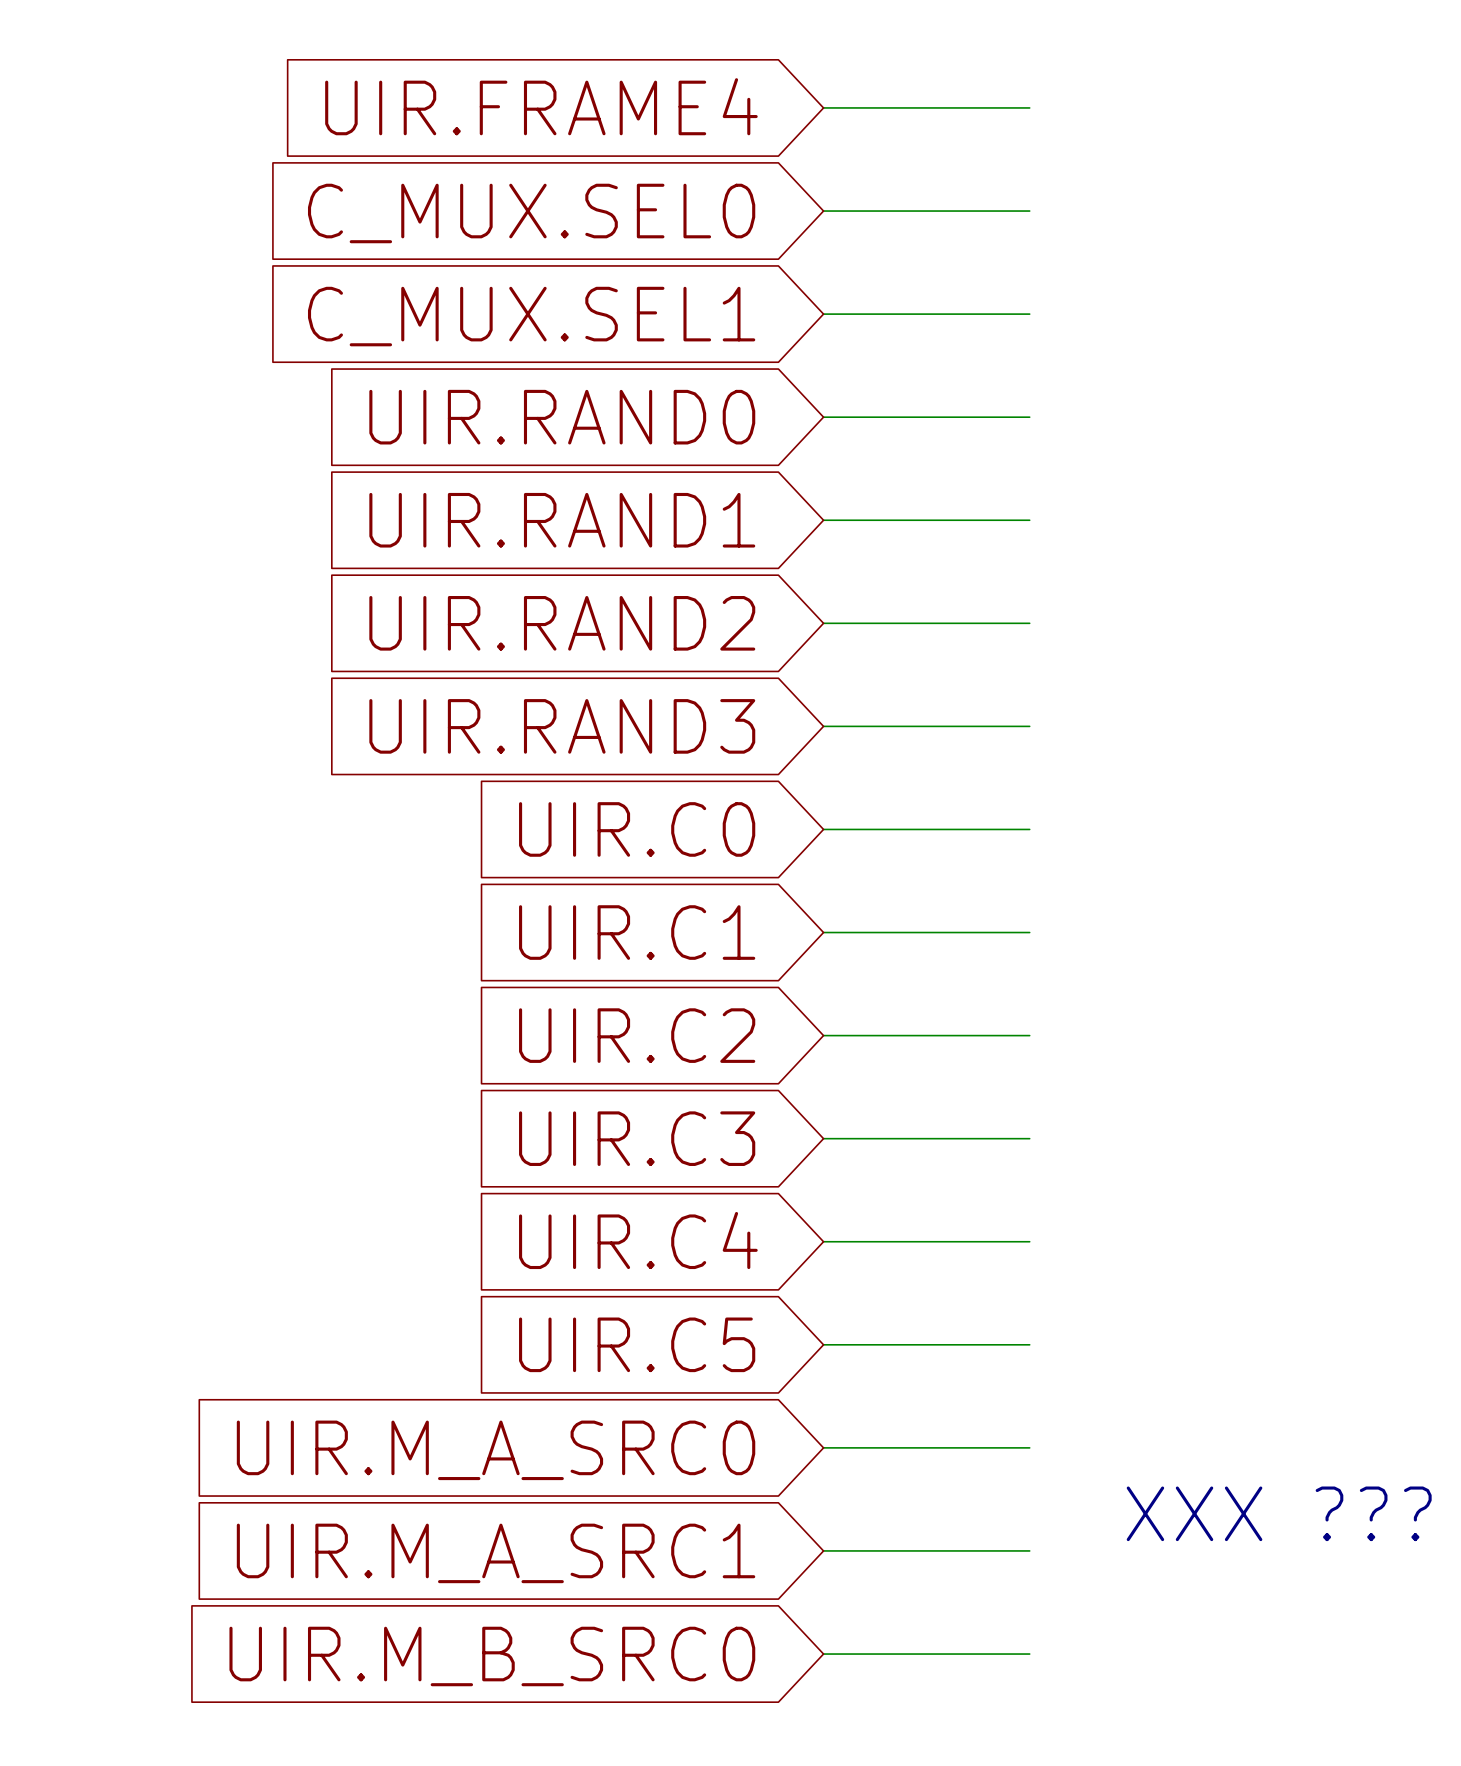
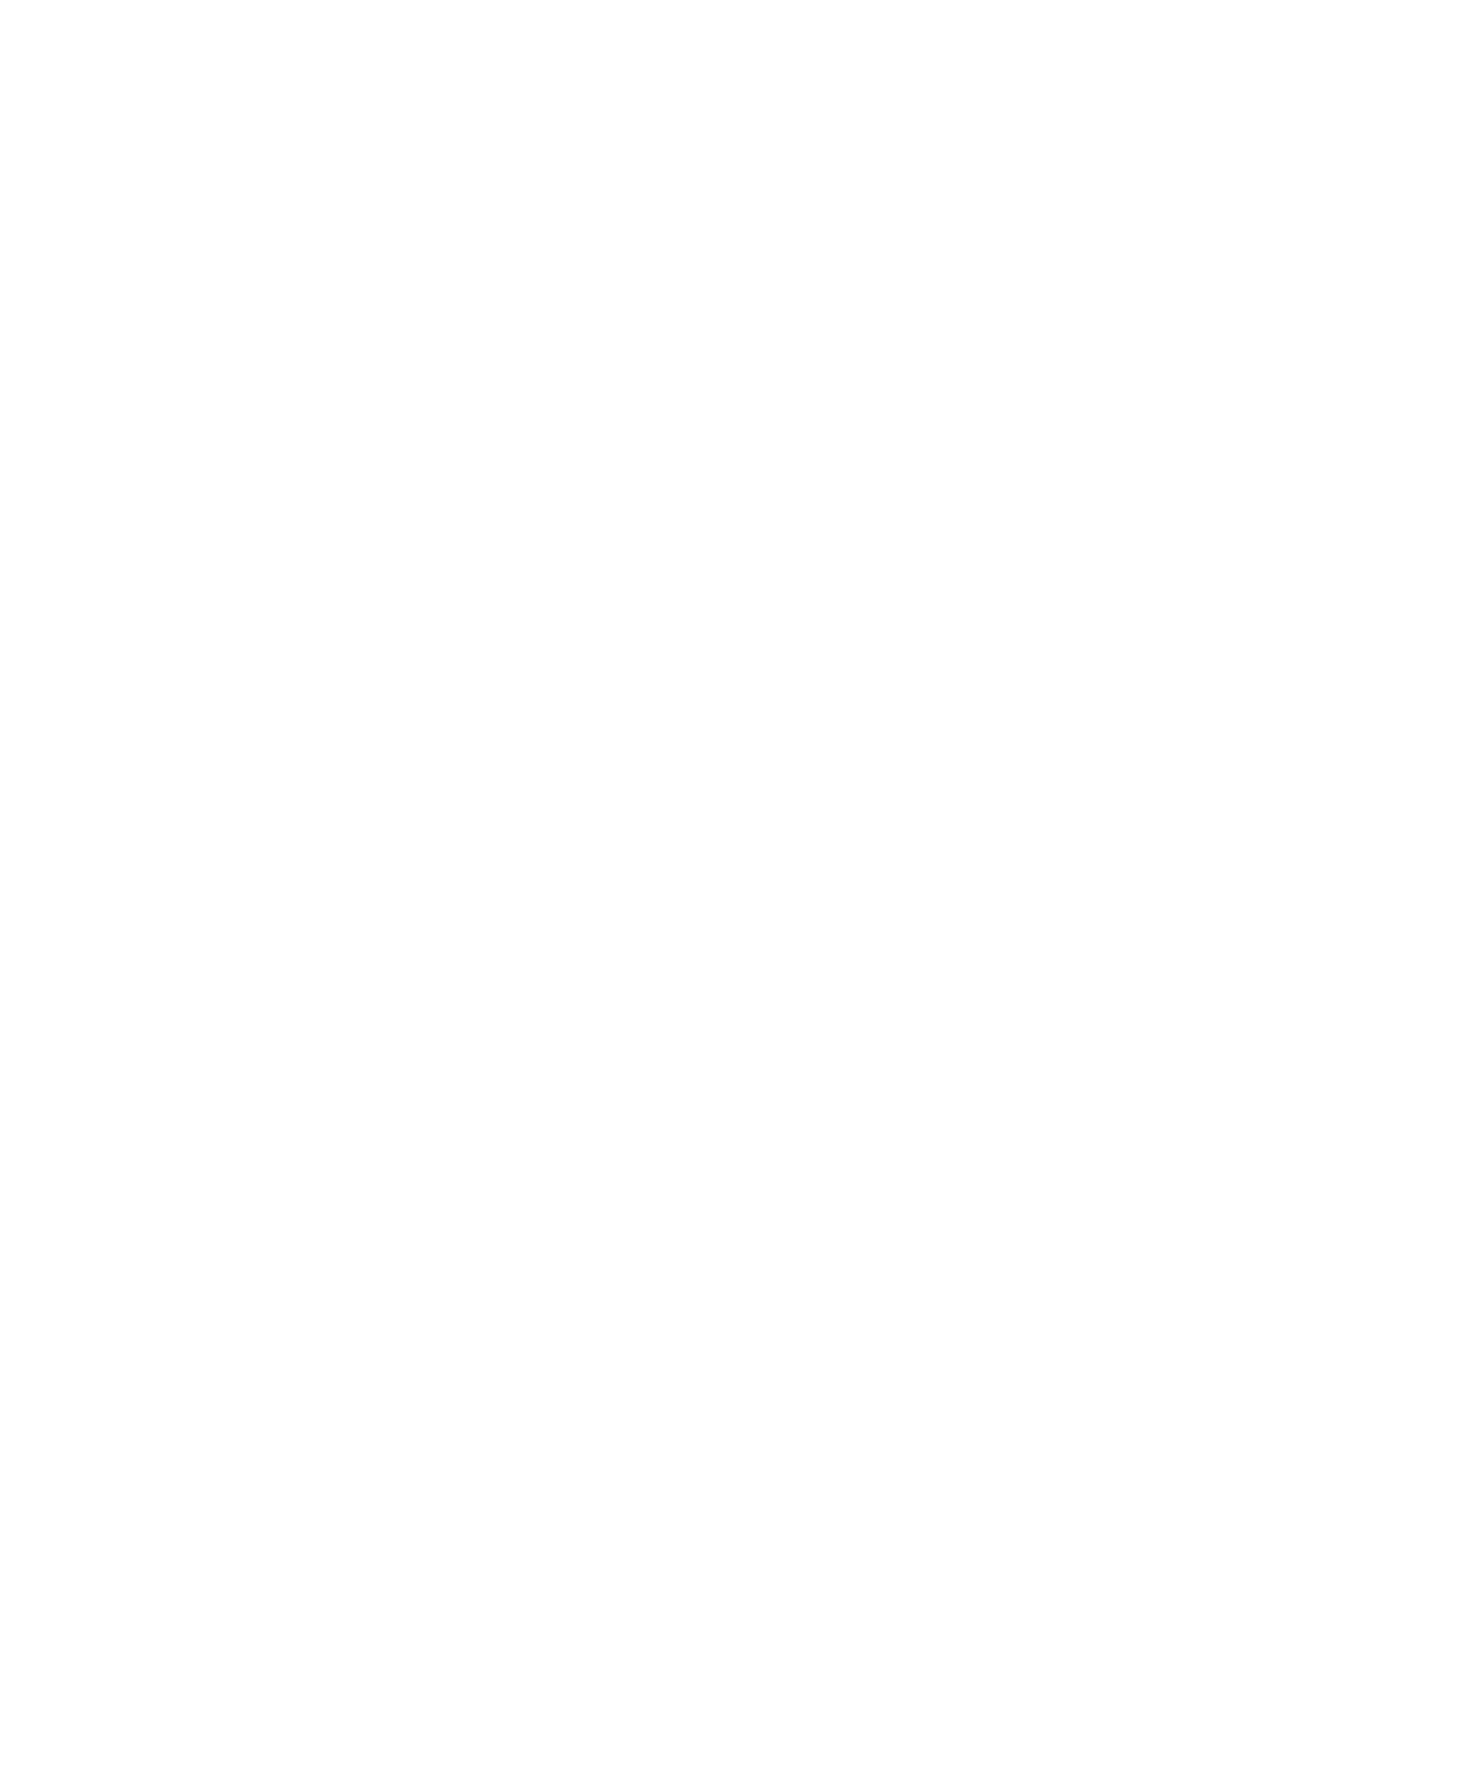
global label: UIR.FRAME4 (541, 106) -> none
wire: (823, 107) (1029, 107) -> none
wire: (823, 211) (1029, 211) -> none
global label: C_MUX.SEL0 (531, 213) -> none
wire: (823, 314) (1029, 314) -> none
global label: C_MUX.SEL1 (531, 316) -> none
global label: UIR.RAND0 (562, 417) -> none
wire: (823, 417) (1029, 417) -> none
global label: UIR.RAND1 (562, 520) -> none
wire: (823, 520) (1029, 520) -> none
global label: UIR.RAND2 (562, 623) -> none
wire: (823, 623) (1029, 623) -> none
global label: UIR.RAND3 (562, 726) -> none
wire: (823, 726) (1029, 726) -> none
global label: UIR.C0 (637, 829) -> none
wire: (823, 829) (1029, 829) -> none
global label: UIR.C1 (637, 932) -> none
wire: (823, 932) (1029, 932) -> none
global label: UIR.C2 (637, 1035) -> none
wire: (823, 1035) (1029, 1035) -> none
global label: UIR.C3 (637, 1138) -> none
wire: (823, 1138) (1029, 1138) -> none
global label: UIR.C4 (638, 1240) -> none
wire: (823, 1241) (1029, 1241) -> none
global label: UIR.C5 (637, 1344) -> none
wire: (823, 1344) (1029, 1344) -> none
wire: (823, 1447) (1029, 1447) -> none
global label: UIR.M_A_SRC0 (496, 1450) -> none
text: XXX ??? (1279, 1513) -> none
wire: (823, 1550) (1029, 1550) -> none
global label: UIR.M_A_SRC1 (496, 1553) -> none
wire: (823, 1654) (1029, 1654) -> none
global label: UIR.M_B_SRC0 (492, 1656) -> none

